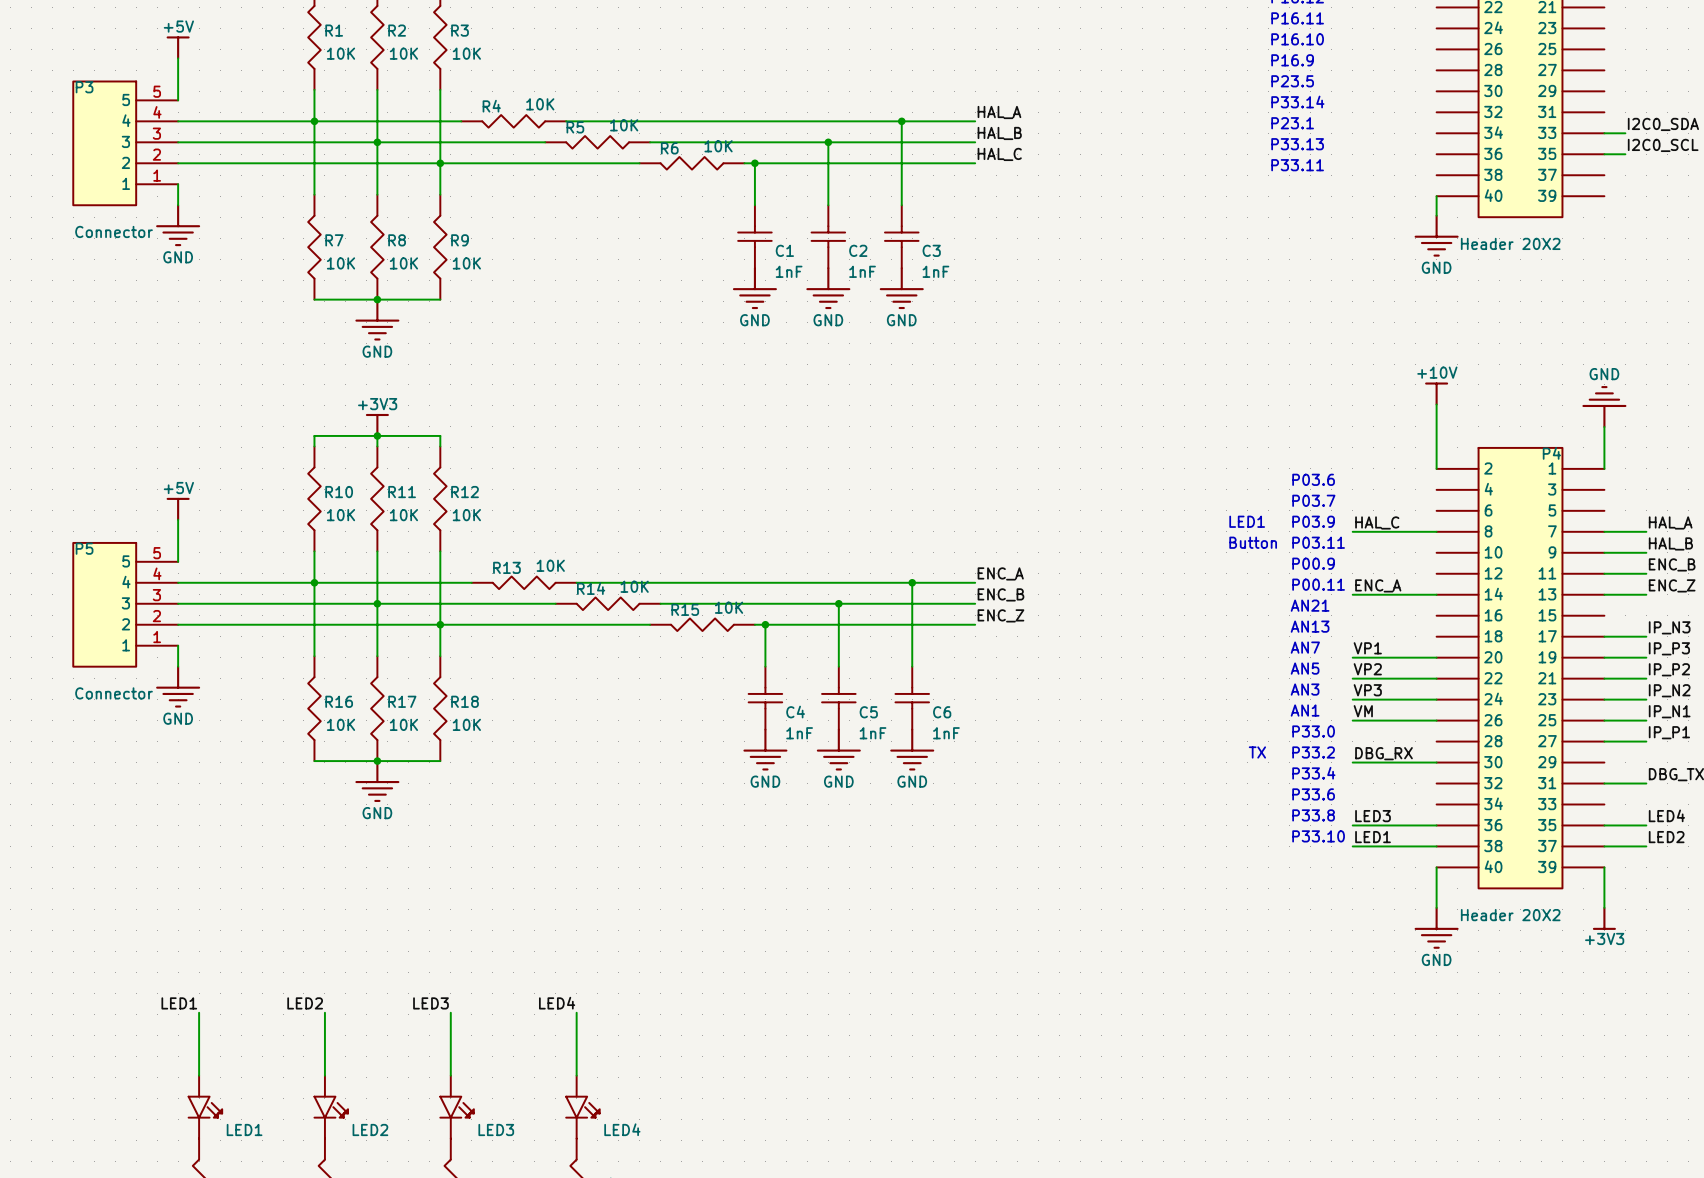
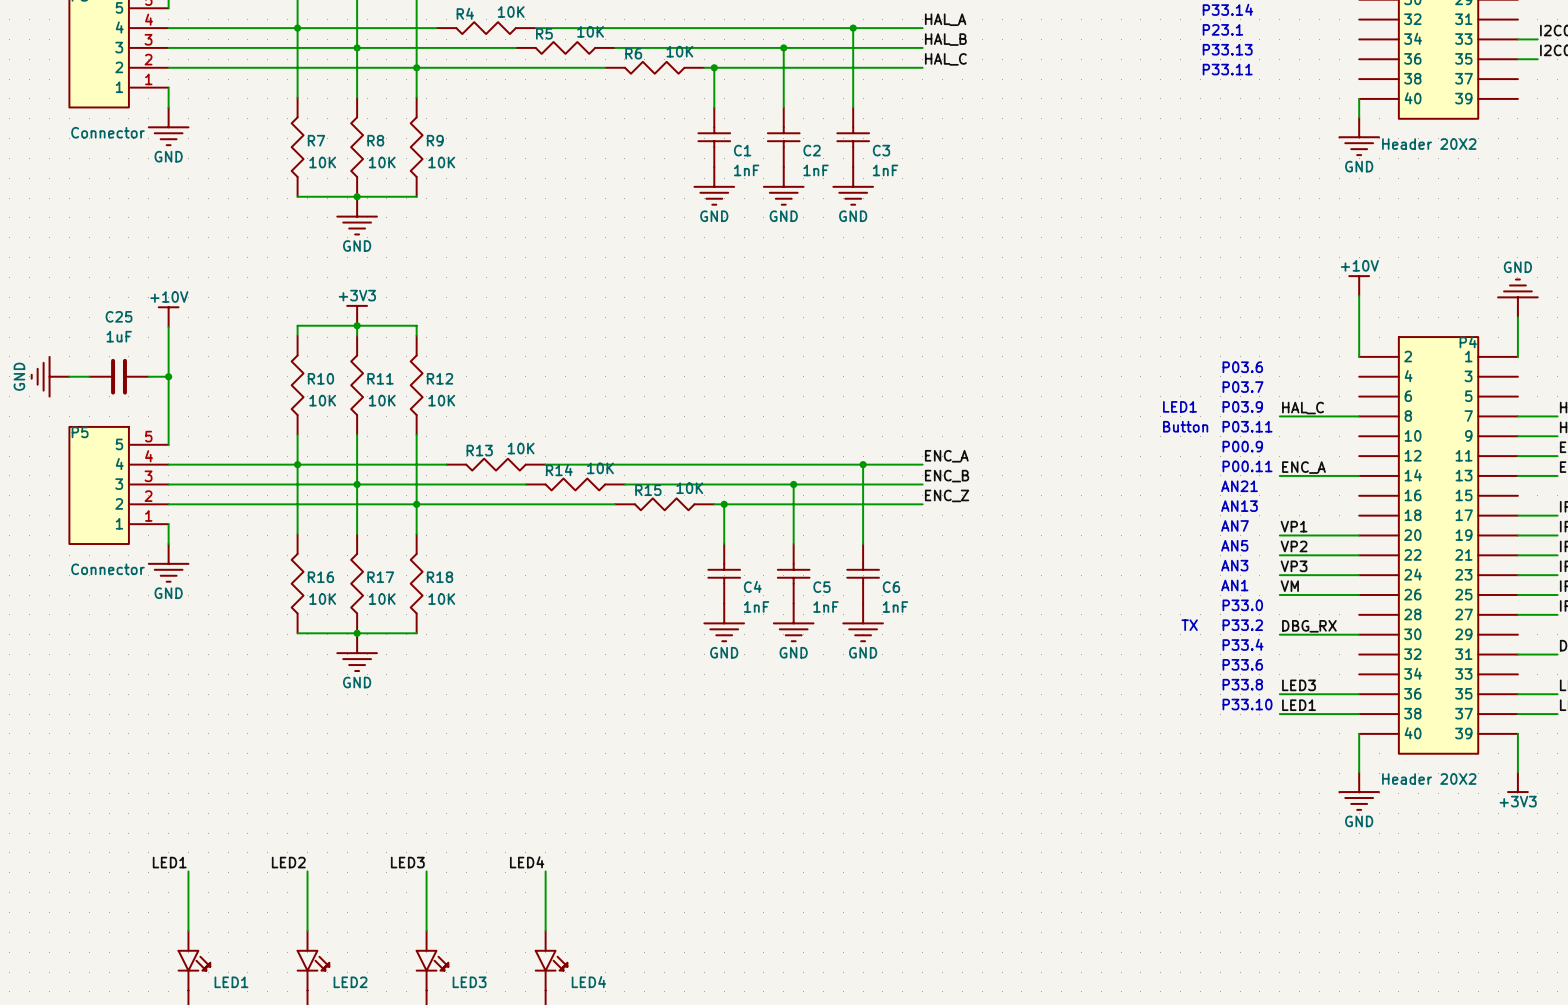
power symbol: none -> +10V (168, 317)
wire: none -> (168, 327) (168, 405)
power symbol: none -> GND (50, 376)
wire: none -> (69, 376) (89, 376)
C25: none -> 1uF (119, 376)
wire: none -> (148, 376) (168, 376)
junction: none -> (168, 376)
power symbol: +5V (178, 509) -> none

